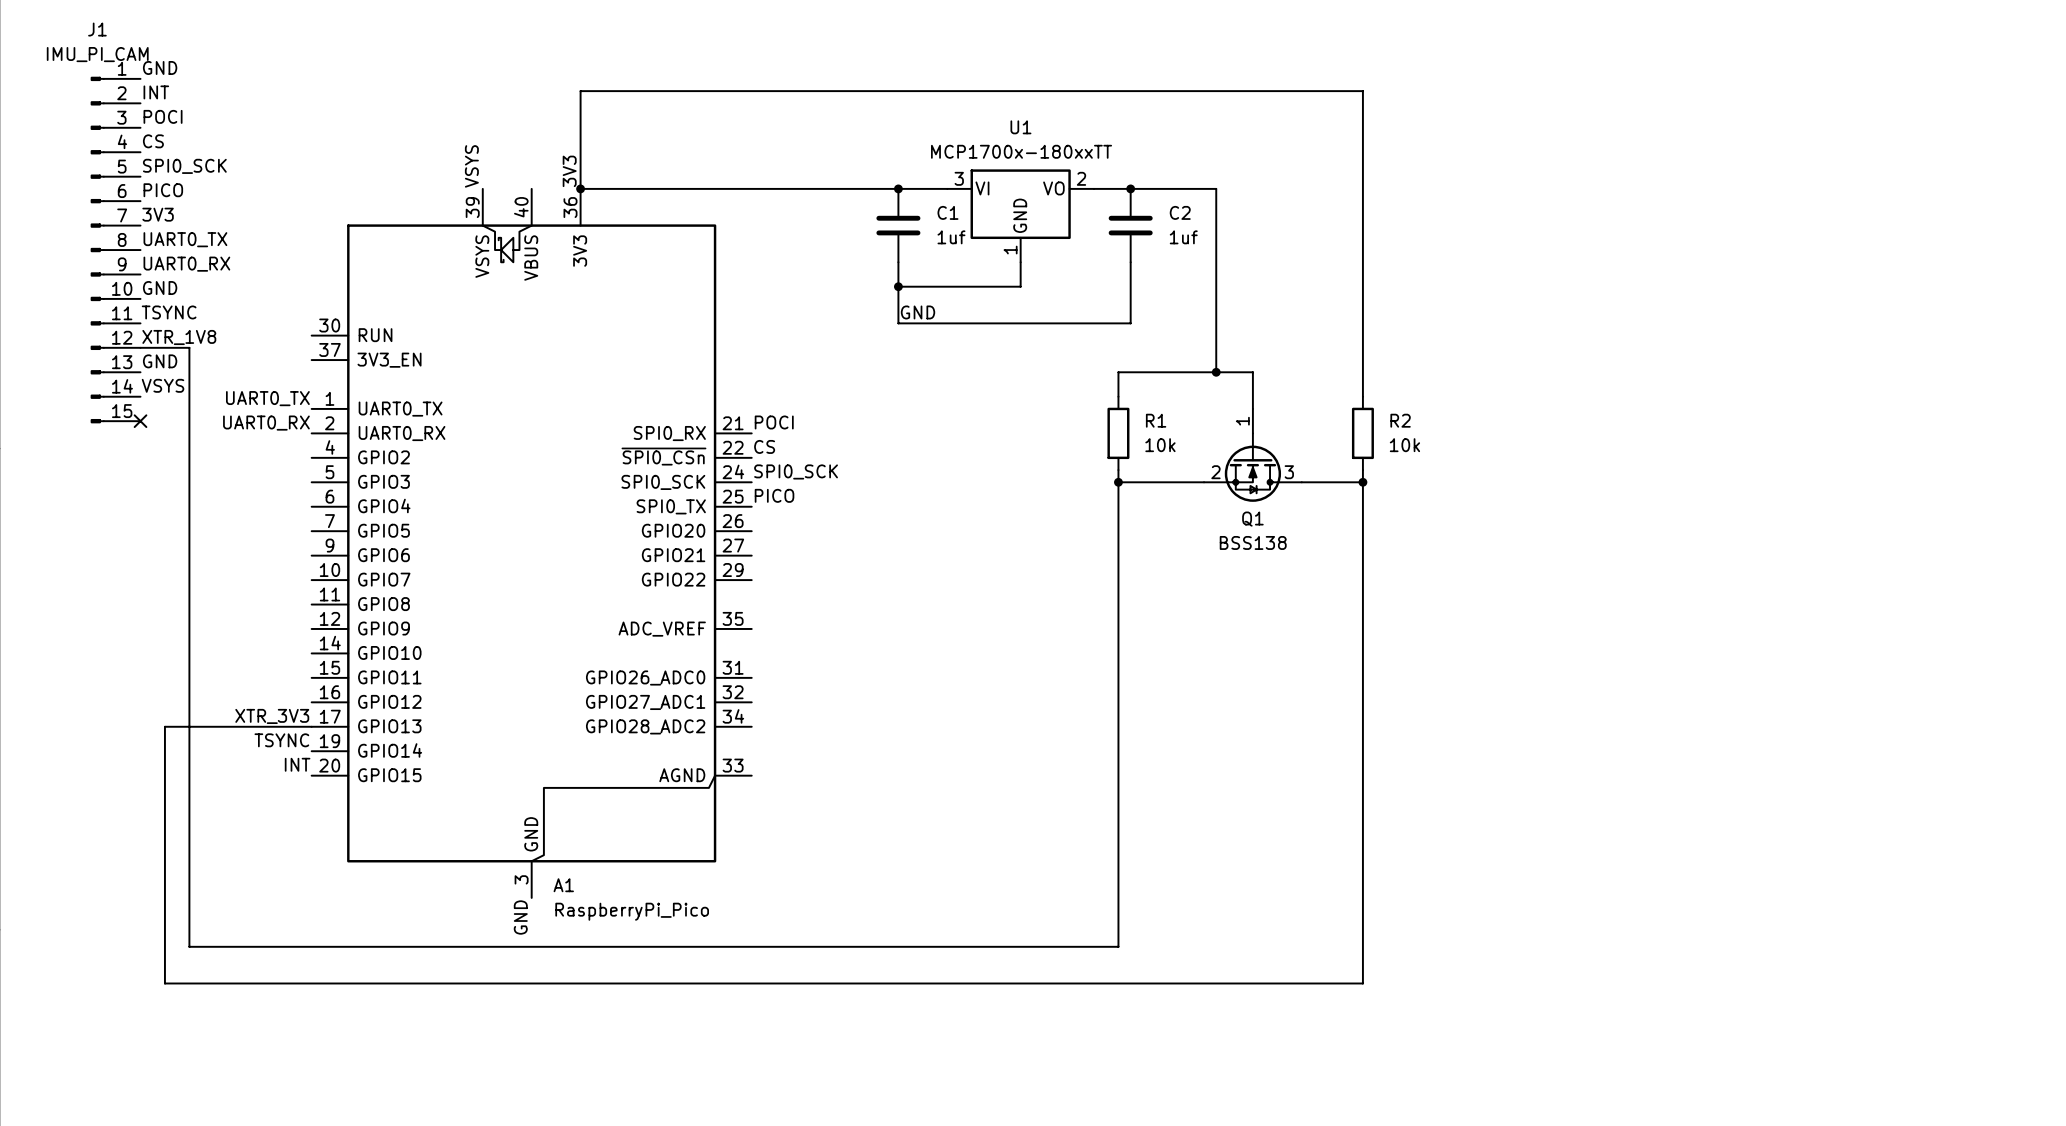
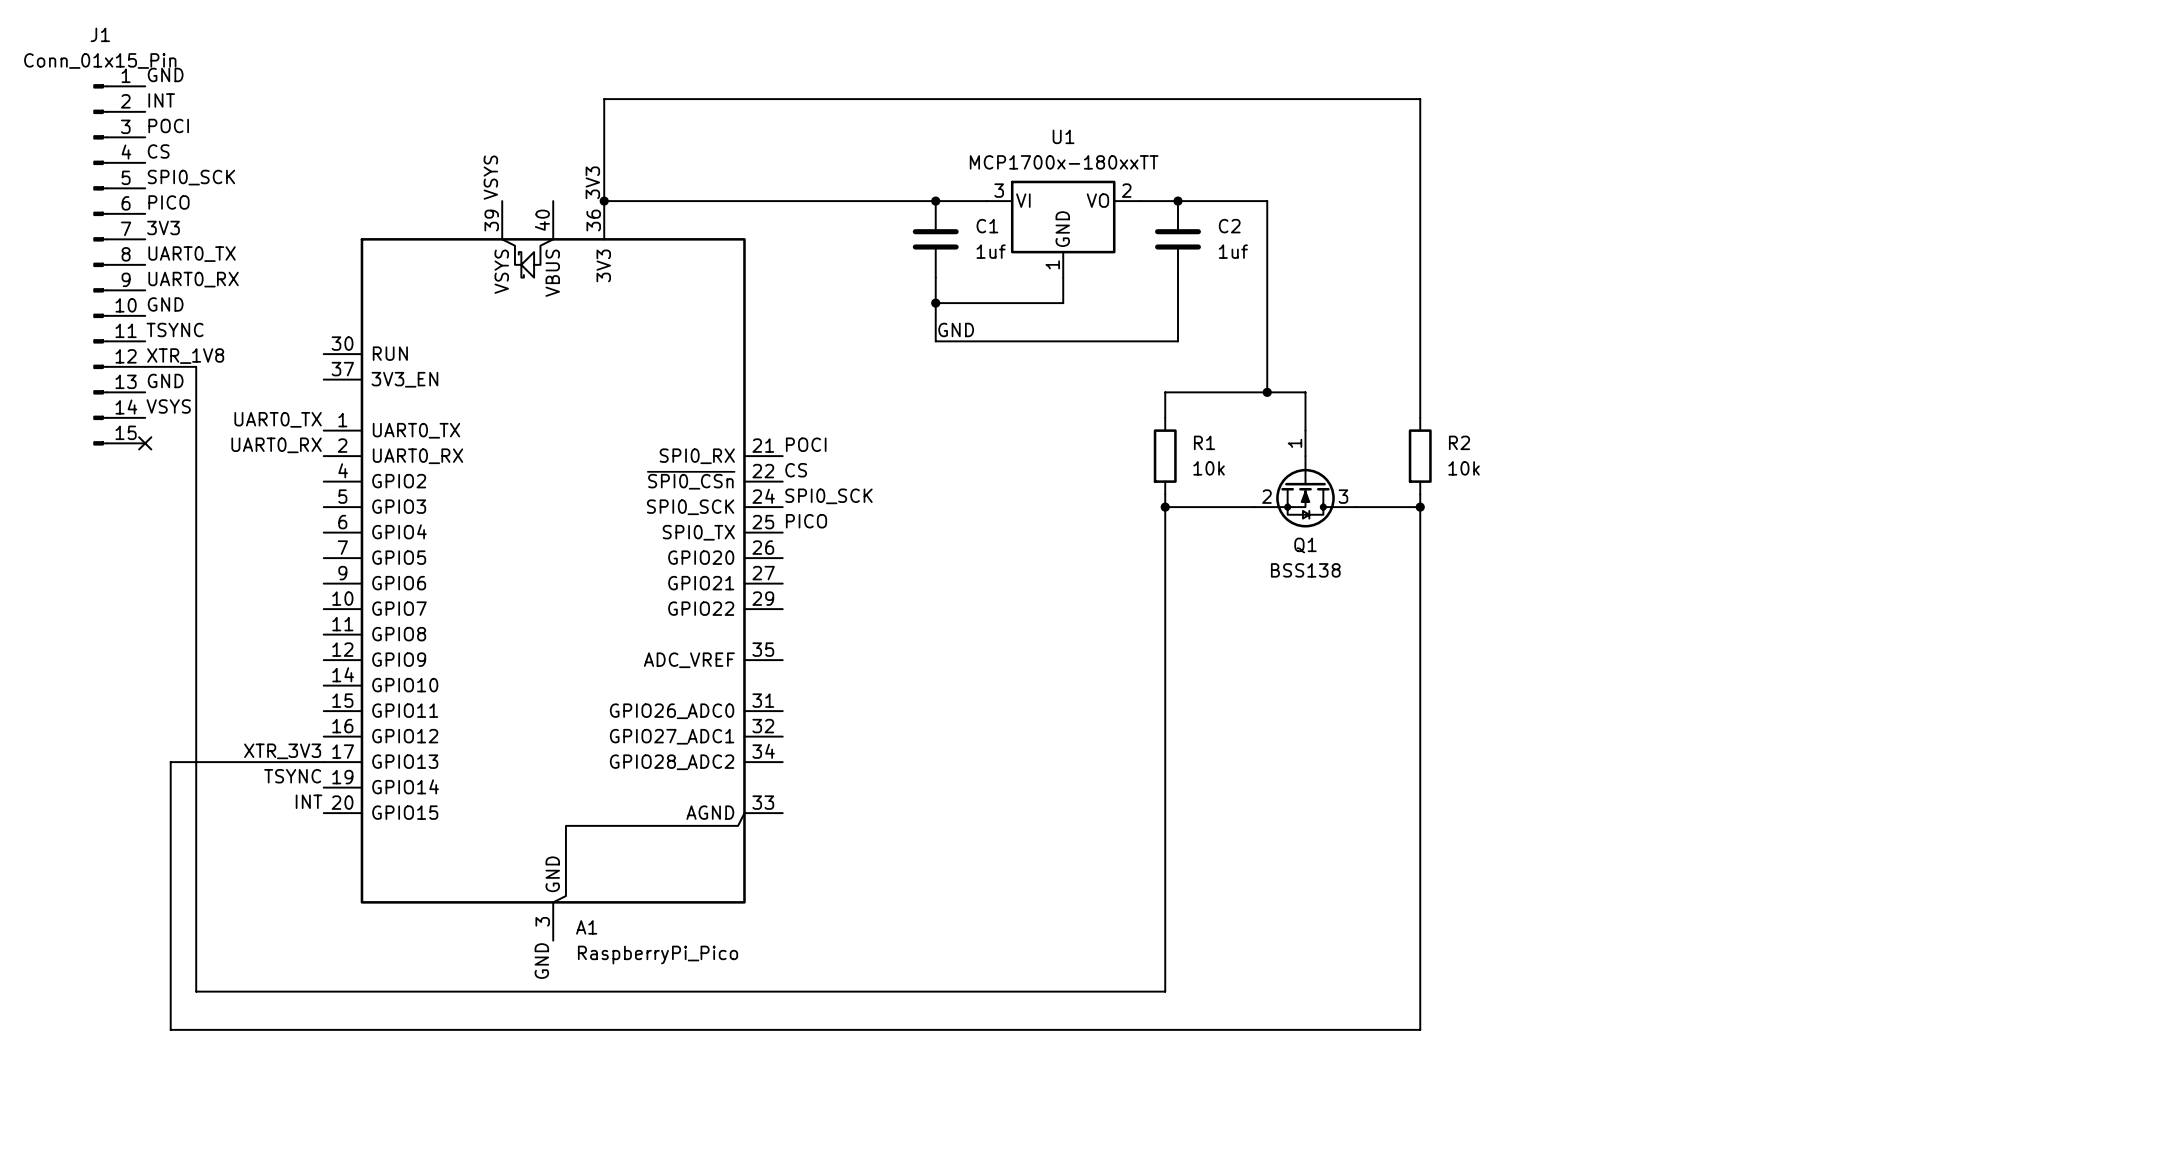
J1 value: IMU_PI_CAM (97, 54) -> Conn_01x15_Pin (100, 60)

